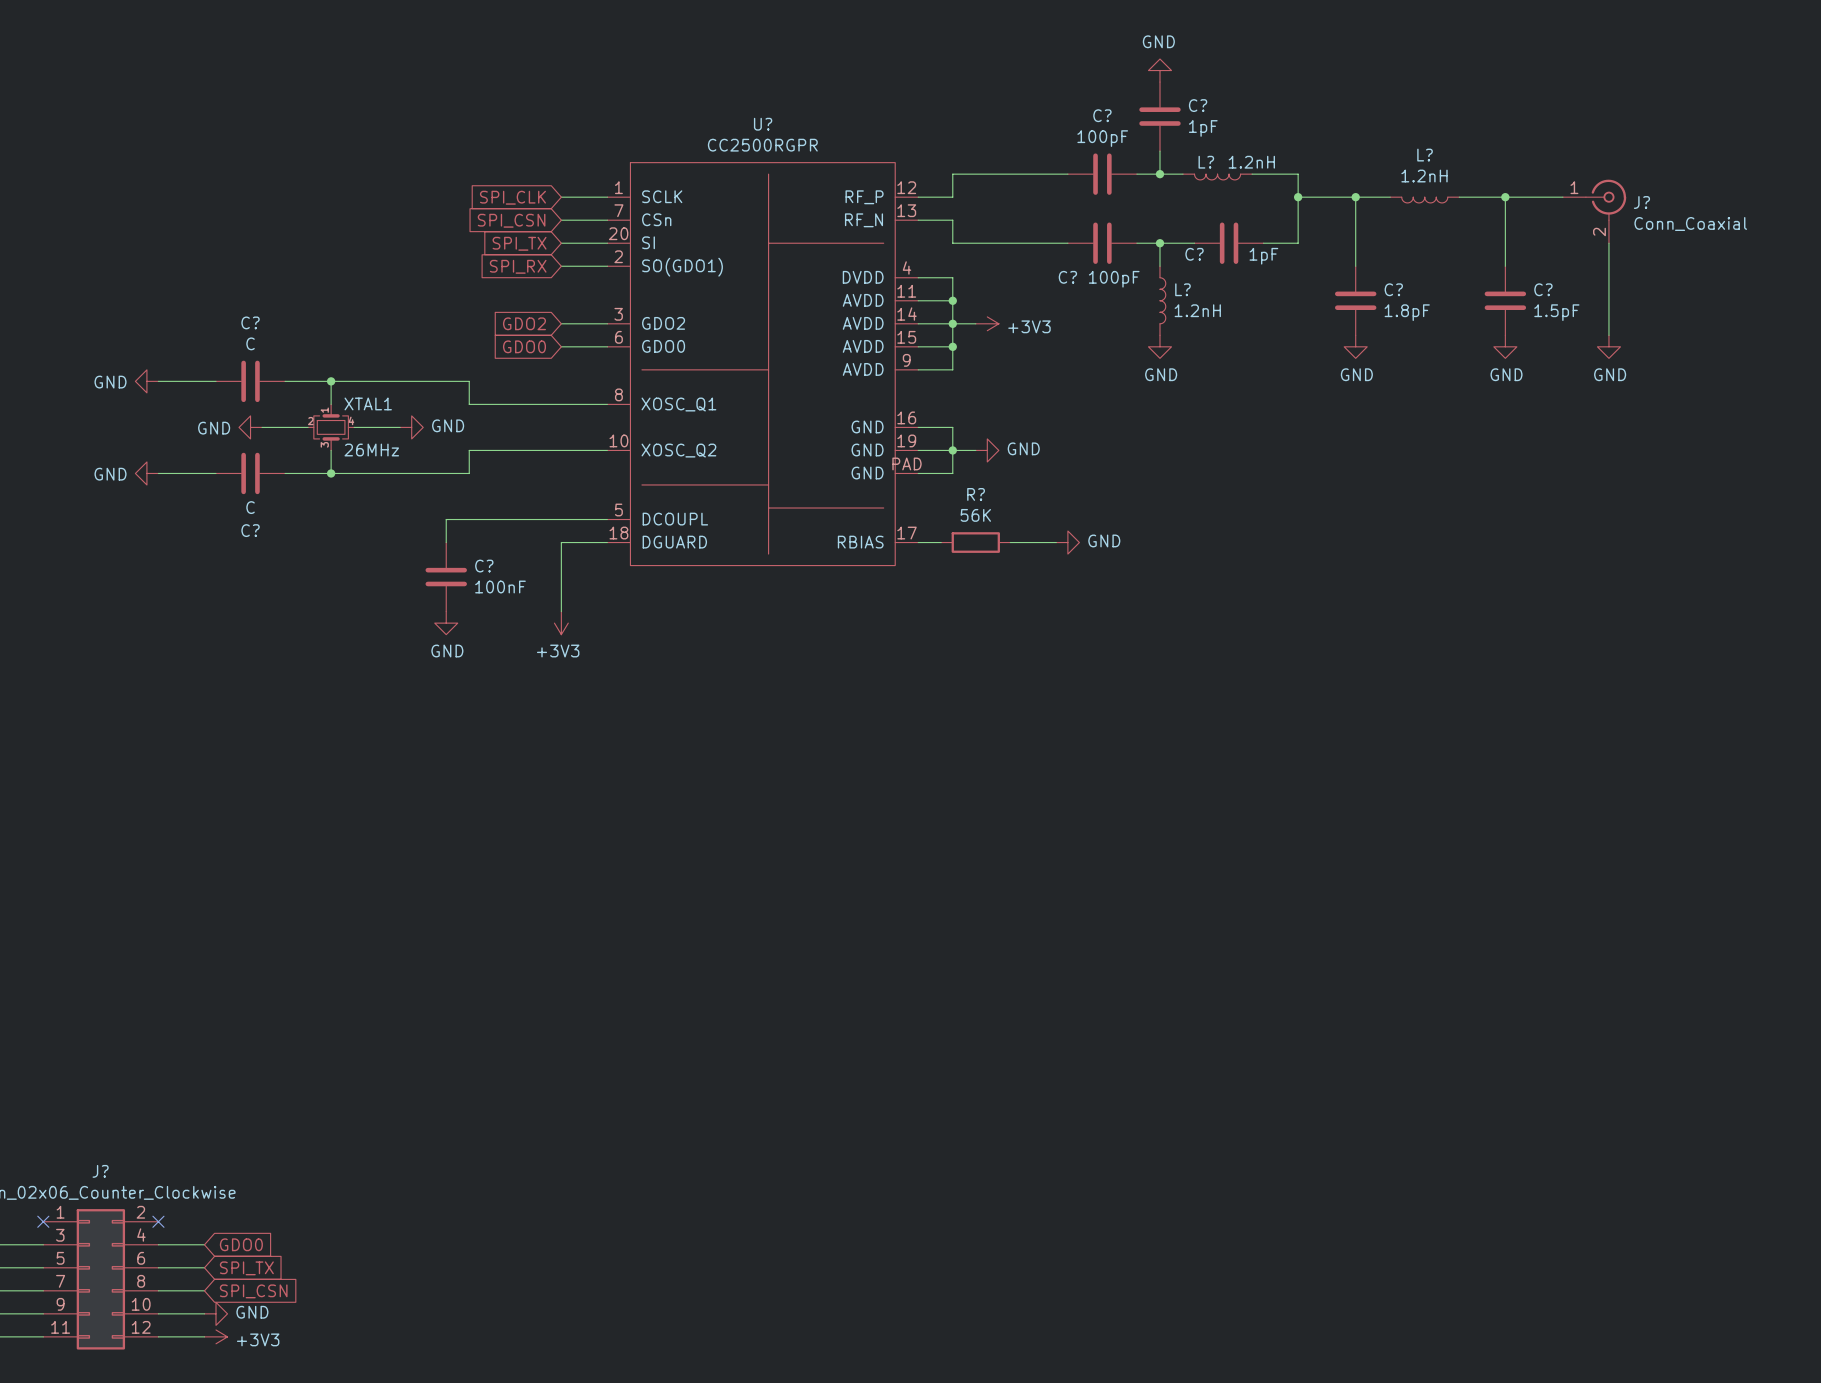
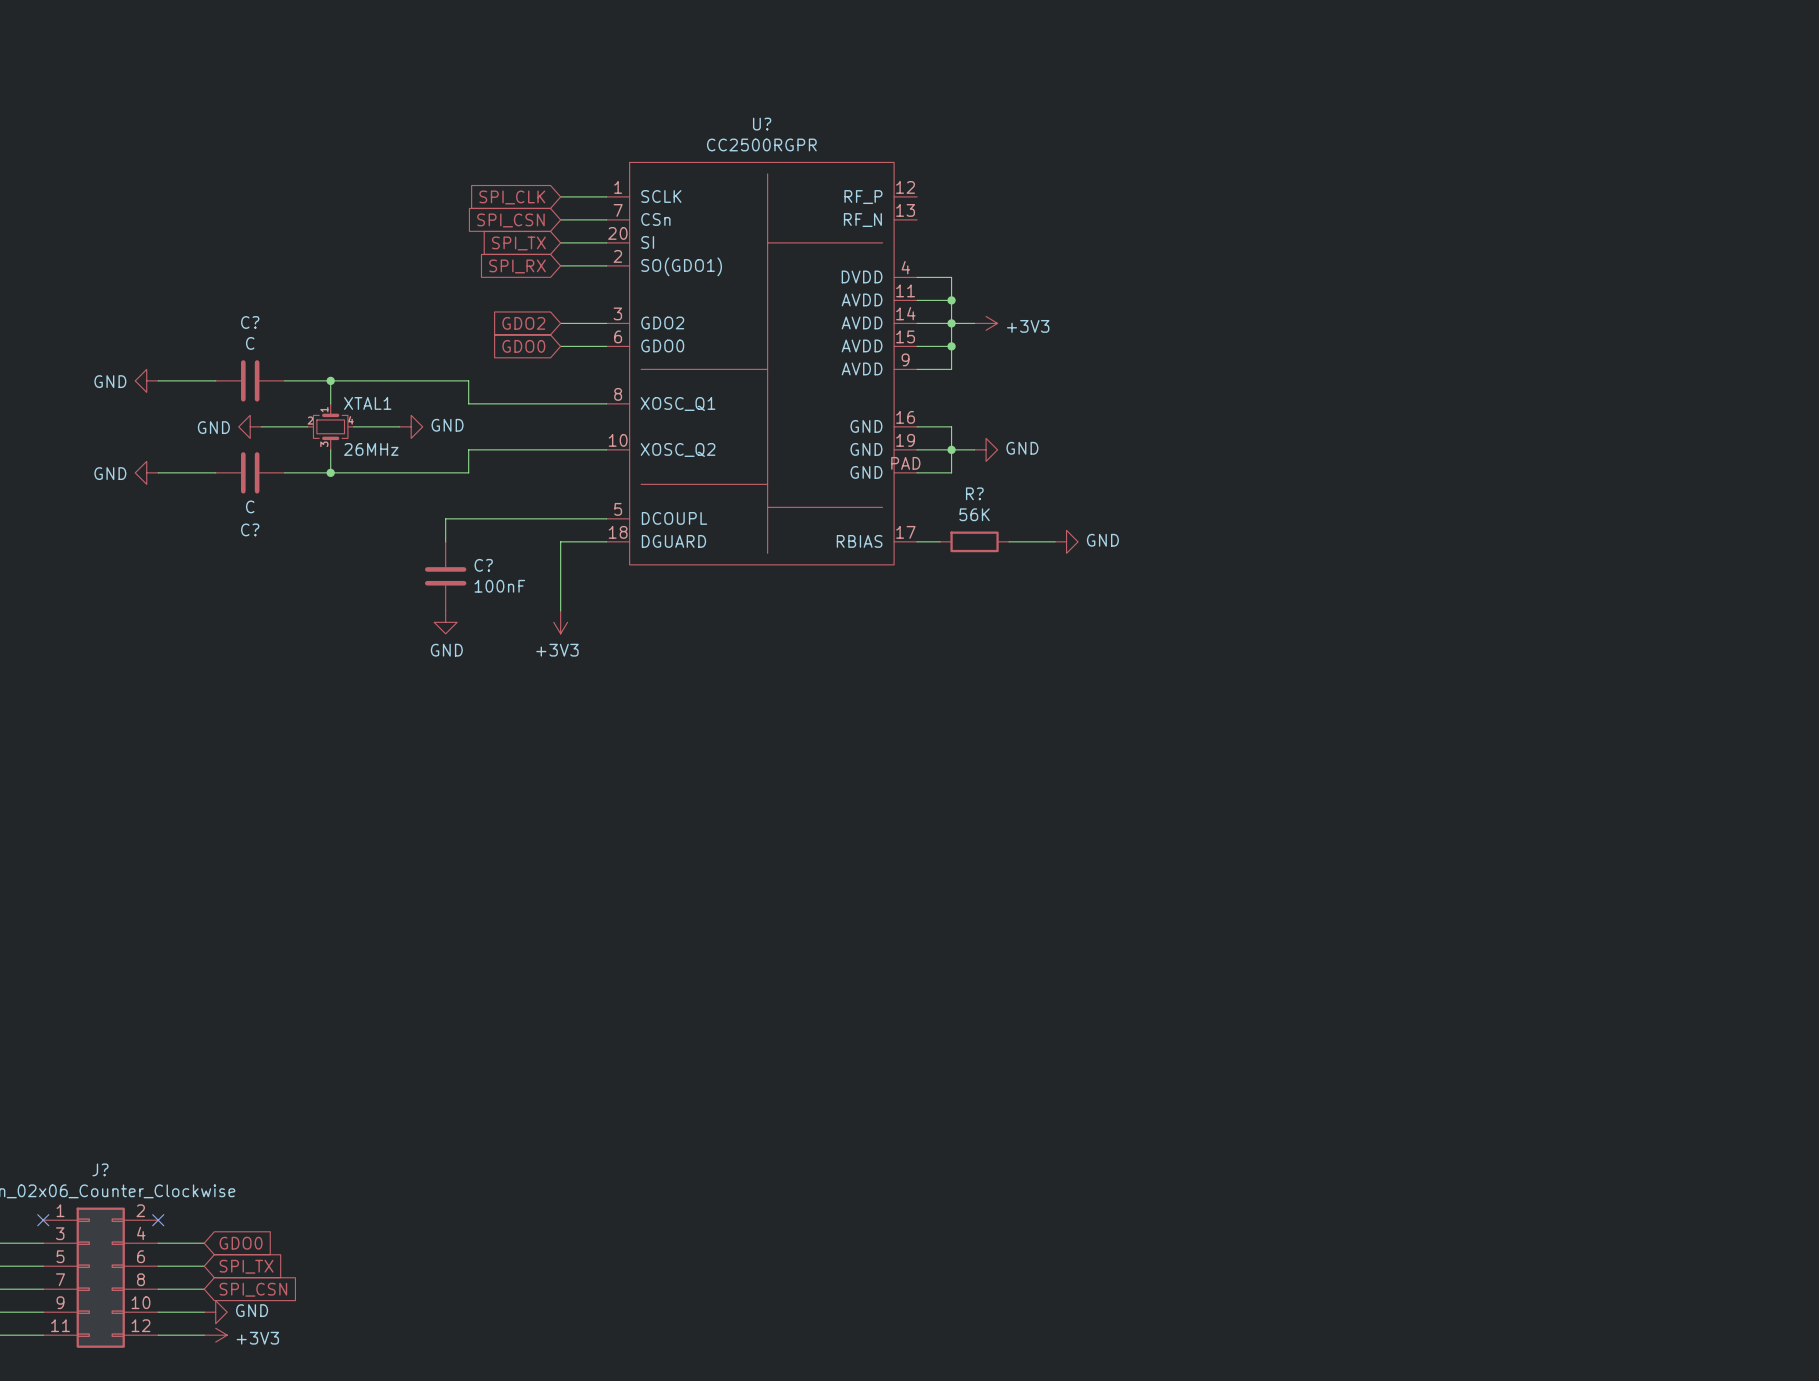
power symbol: GND (1159, 70) -> none
C?: 1pF (1159, 116) -> none
wire: (1159, 151) (1159, 174) -> none
wire: (1067, 174) (952, 174) (952, 197) (918, 197) -> none
C?: 100pF (1102, 174) -> none
wire: (1136, 174) (1183, 174) -> none
junction: (1159, 174) -> none
wire: (1252, 174) (1298, 174) (1298, 243) (1263, 243) -> none
L?: 1.2nH (1217, 177) -> none
wire: (1298, 197) (1390, 197) -> none
junction: (1298, 197) -> none
wire: (1355, 197) (1355, 266) -> none
junction: (1355, 197) -> none
wire: (1459, 197) (1562, 197) -> none
wire: (1505, 197) (1505, 266) -> none
junction: (1505, 197) -> none
L?: 1.2nH (1424, 200) -> none
J?: Conn_Coaxial (1594, 211) -> none
wire: (918, 220) (952, 220) (952, 243) (1067, 243) -> none
C?: 100pF (1102, 243) -> none
wire: (1136, 243) (1194, 243) -> none
wire: (1159, 243) (1159, 266) -> none
junction: (1159, 243) -> none
C?: 1pF (1229, 243) -> none
wire: (1608, 243) (1608, 335) -> none
L?: 1.2nH (1162, 300) -> none
C?: 1.8pF (1355, 300) -> none
C?: 1.5pF (1505, 300) -> none
power symbol: GND (1159, 346) -> none
power symbol: GND (1355, 346) -> none
power symbol: GND (1505, 346) -> none
power symbol: GND (1608, 346) -> none

